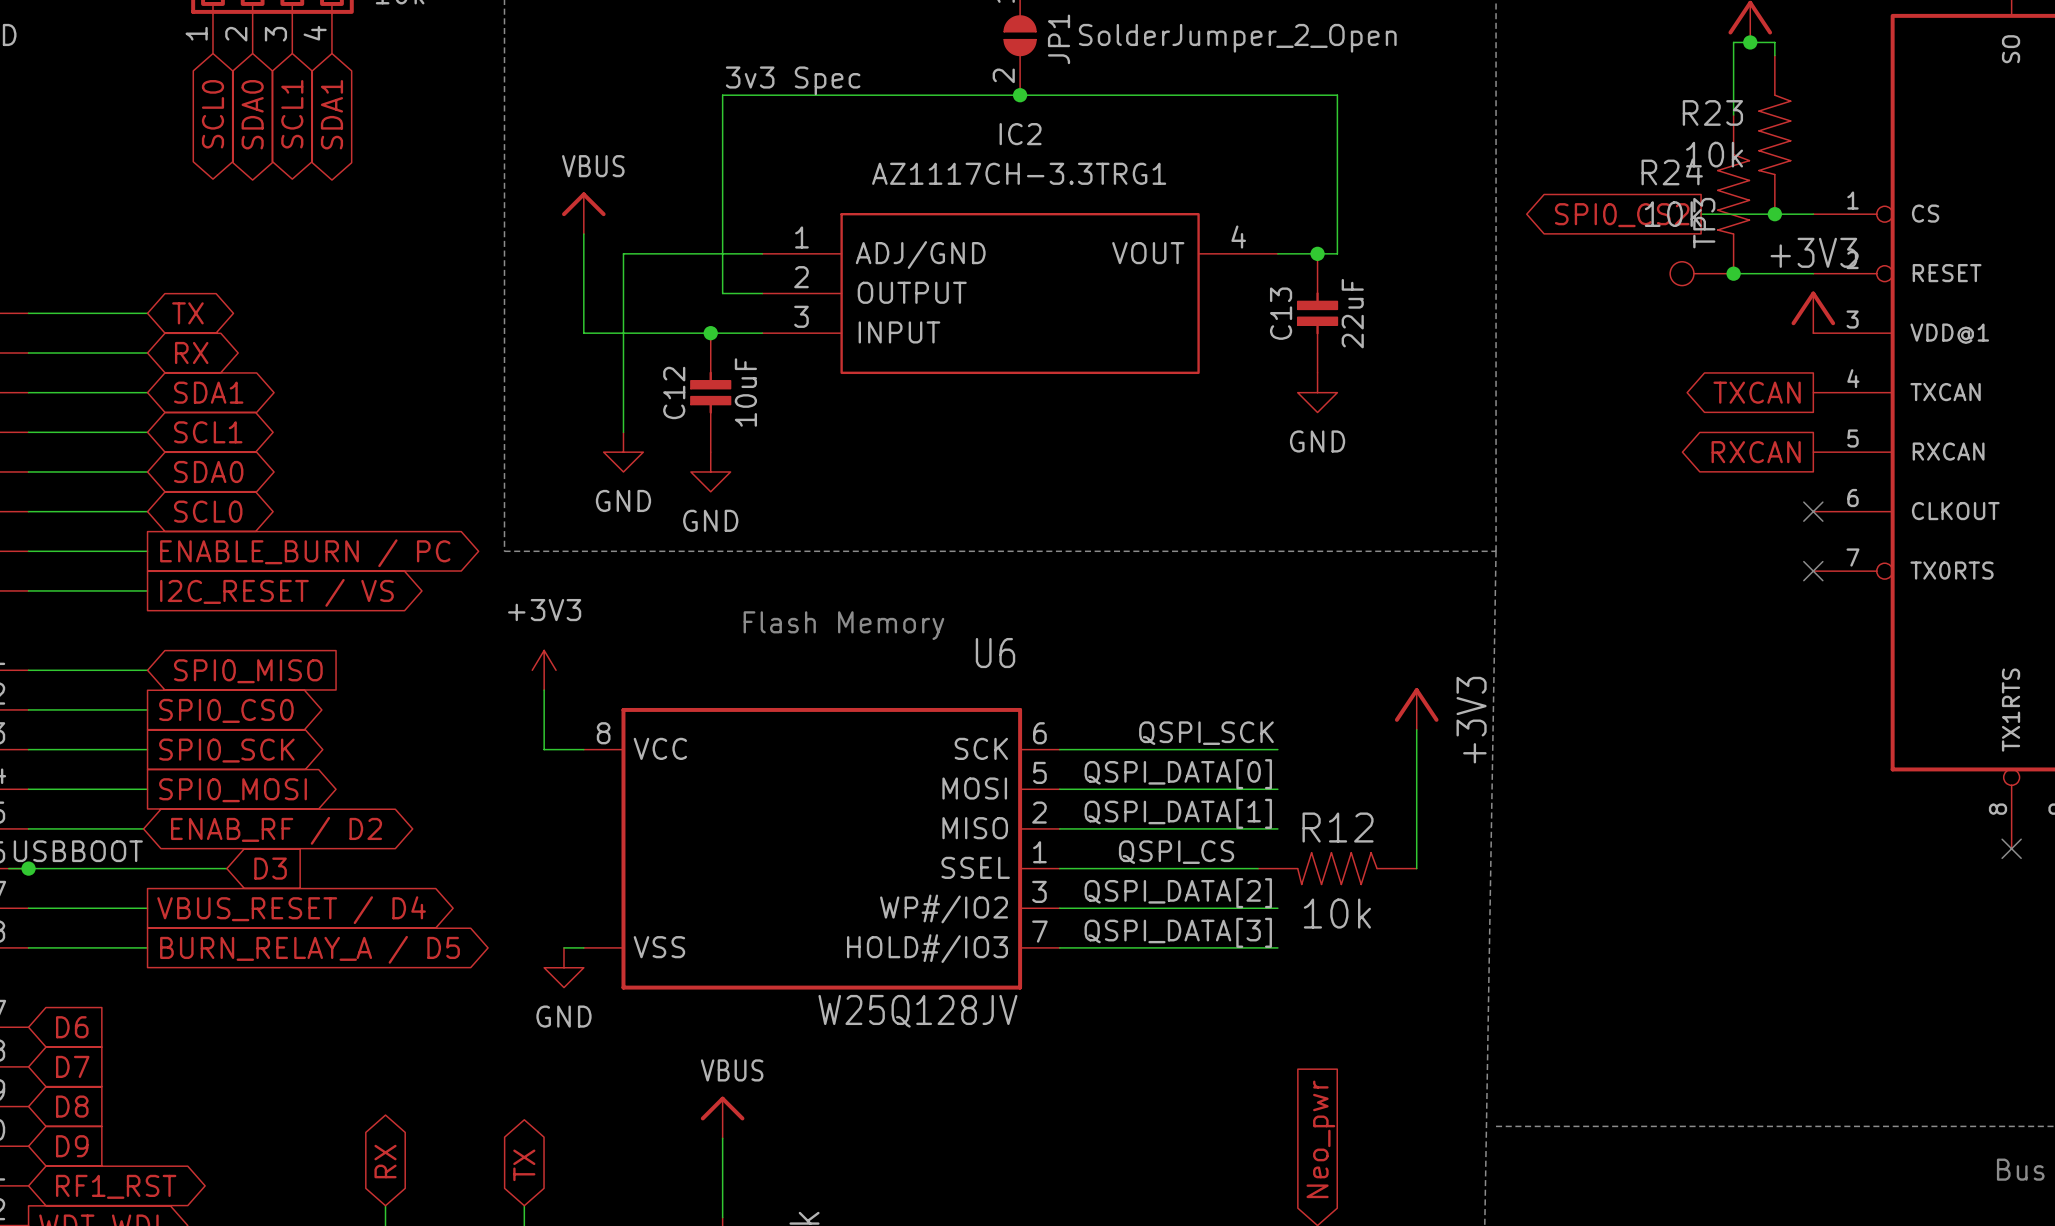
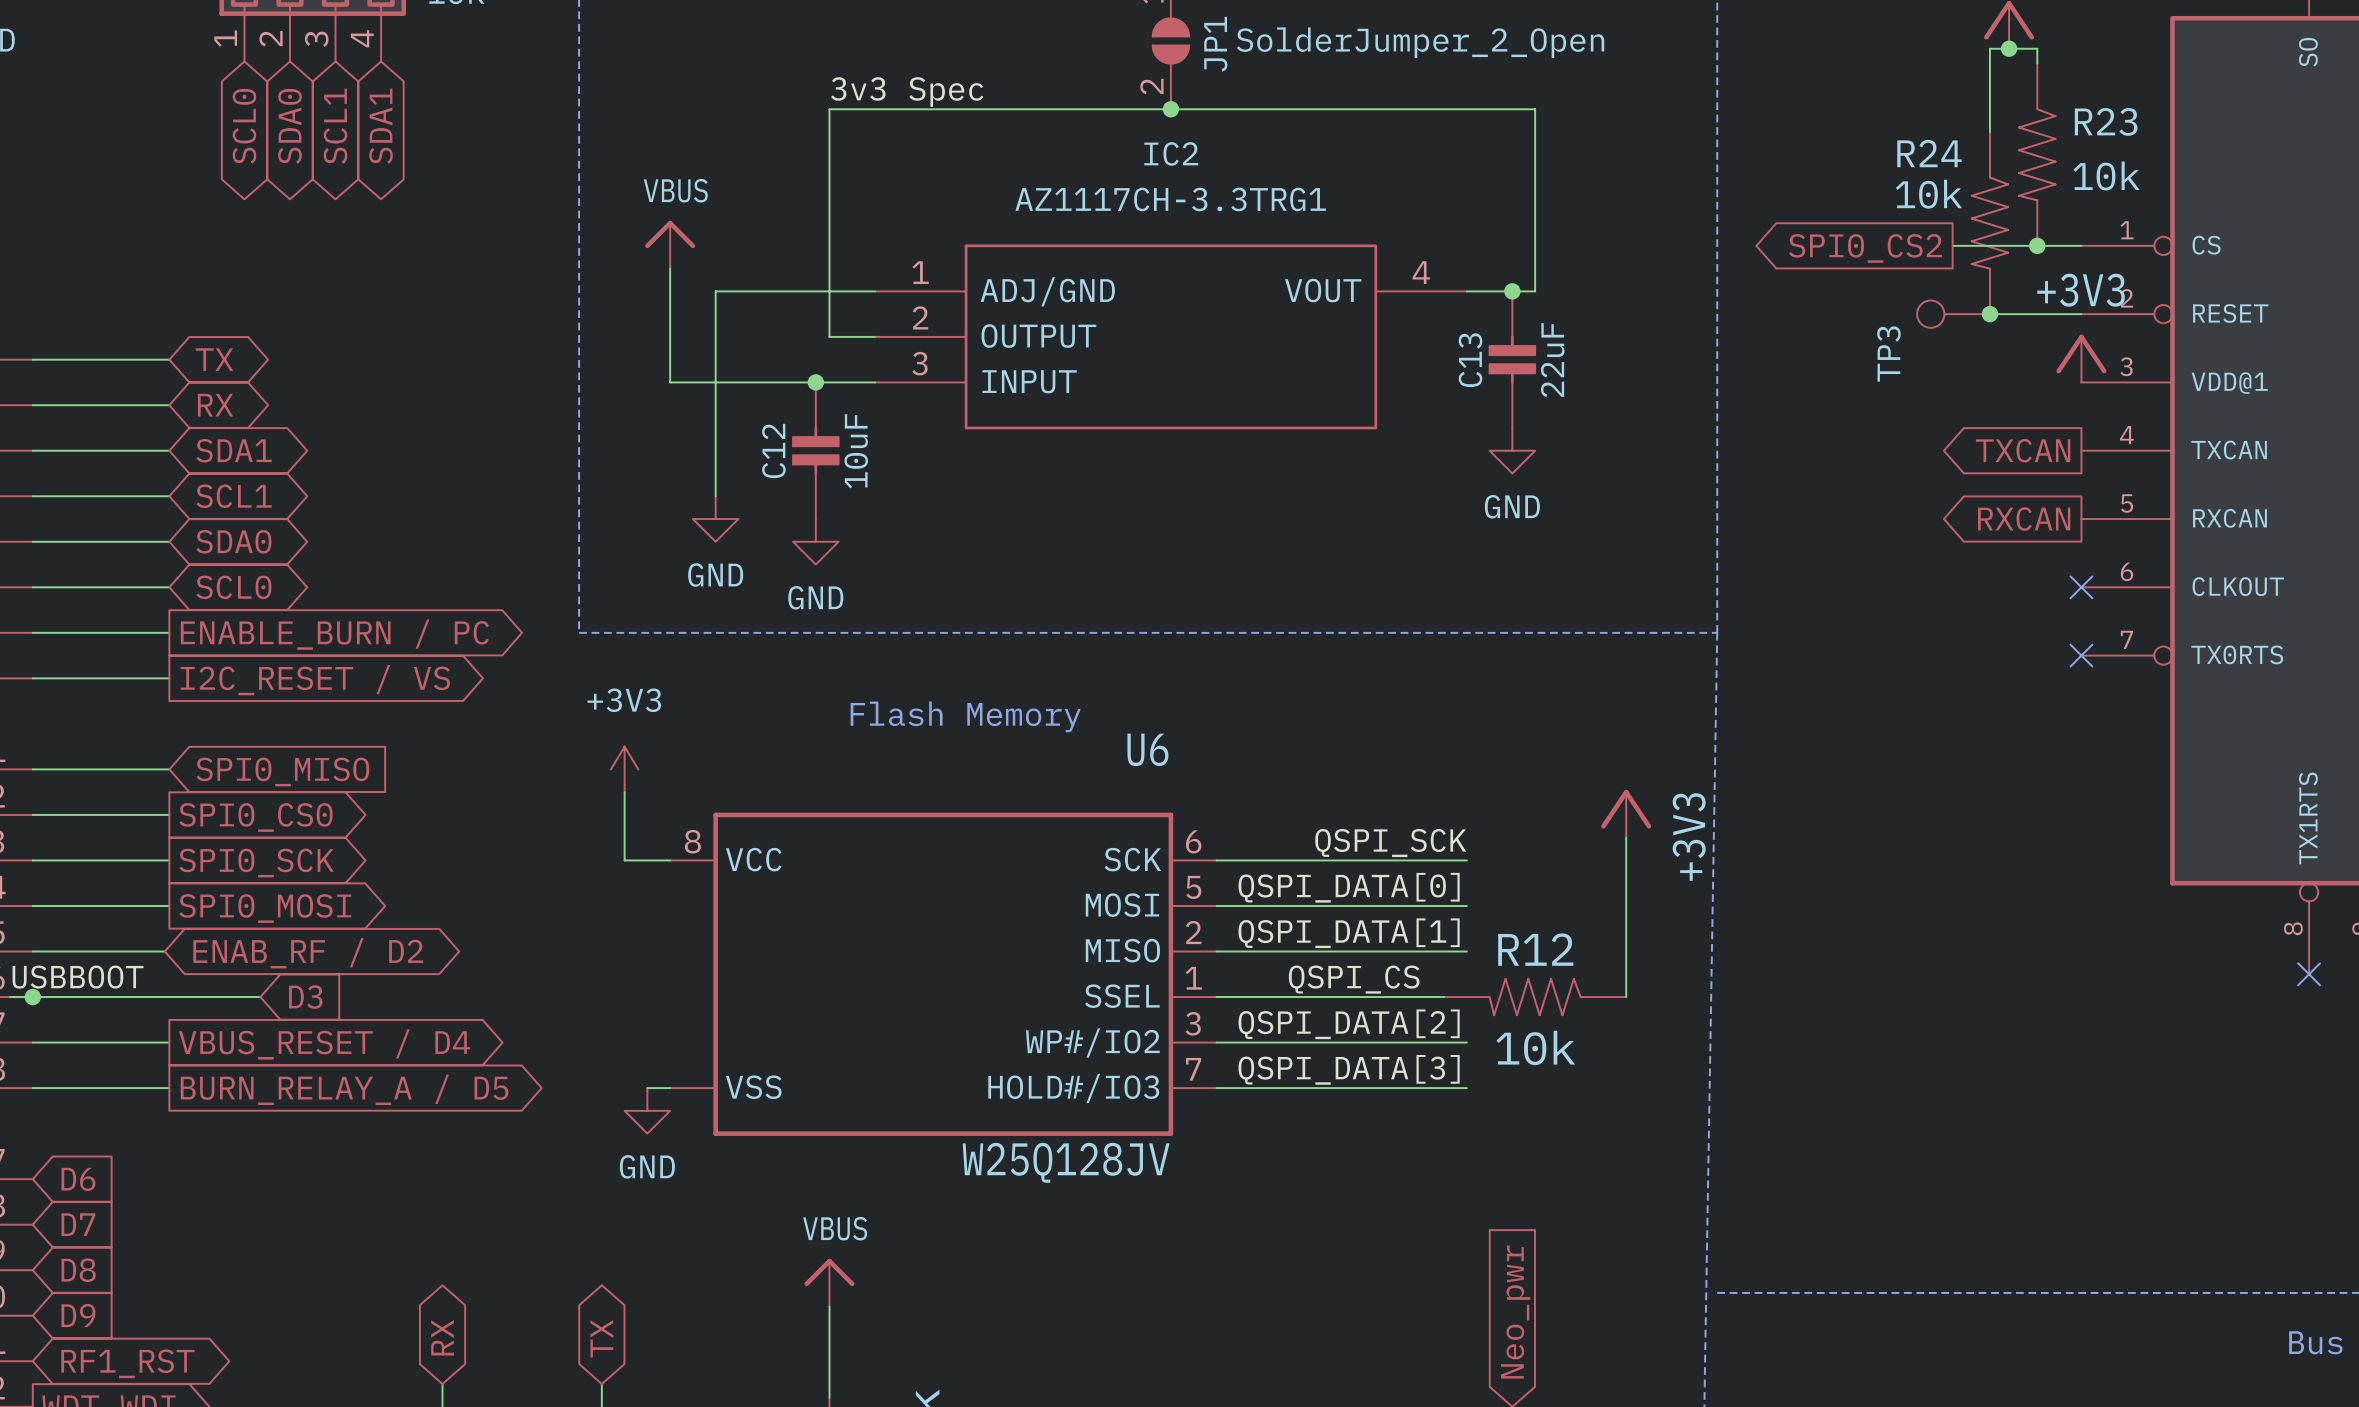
R23 name position: R23 (1712, 112) -> R23 (2106, 121)
R23 value position: 10k (1714, 154) -> 10k (2106, 175)
R24 name position: R24 (1672, 171) -> R24 (1929, 153)
R24 value position: 10k (1673, 214) -> 10k (1928, 194)
TP3 name position: TP3 (1704, 223) -> TP3 (1888, 354)

